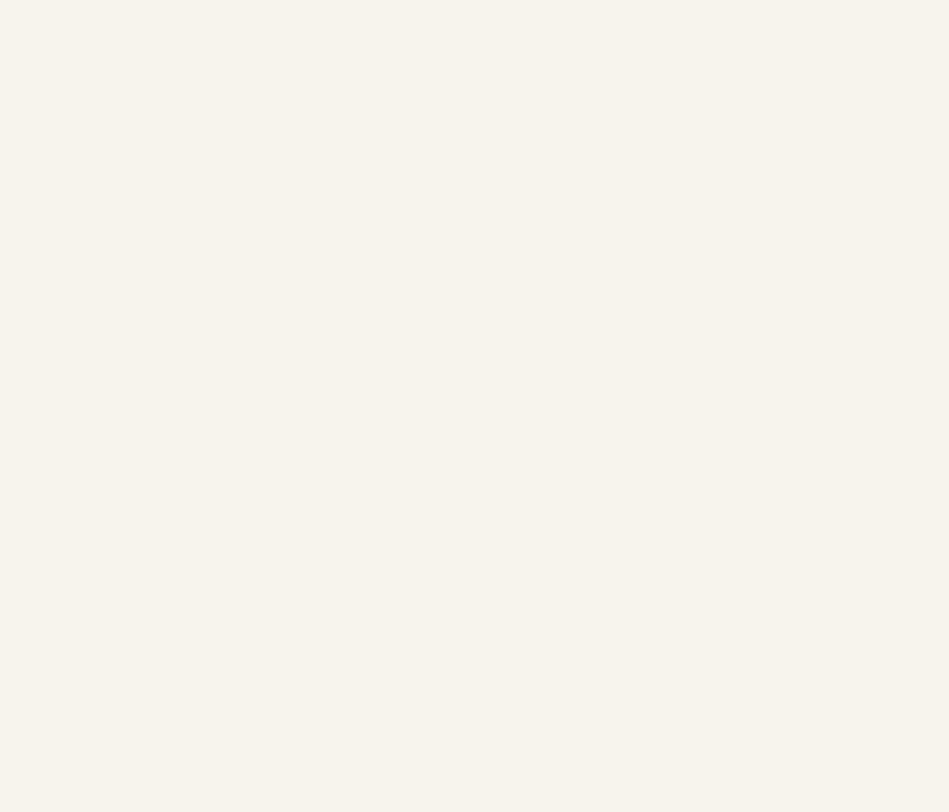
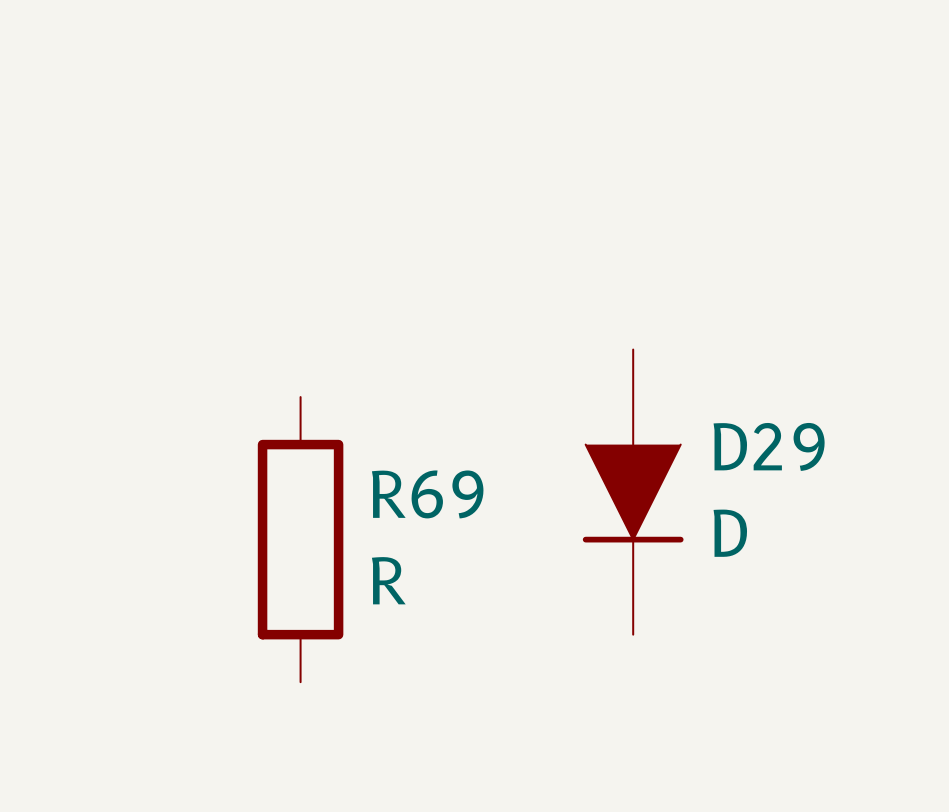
D29: none -> D (633, 492)
R69: none -> R (300, 539)

